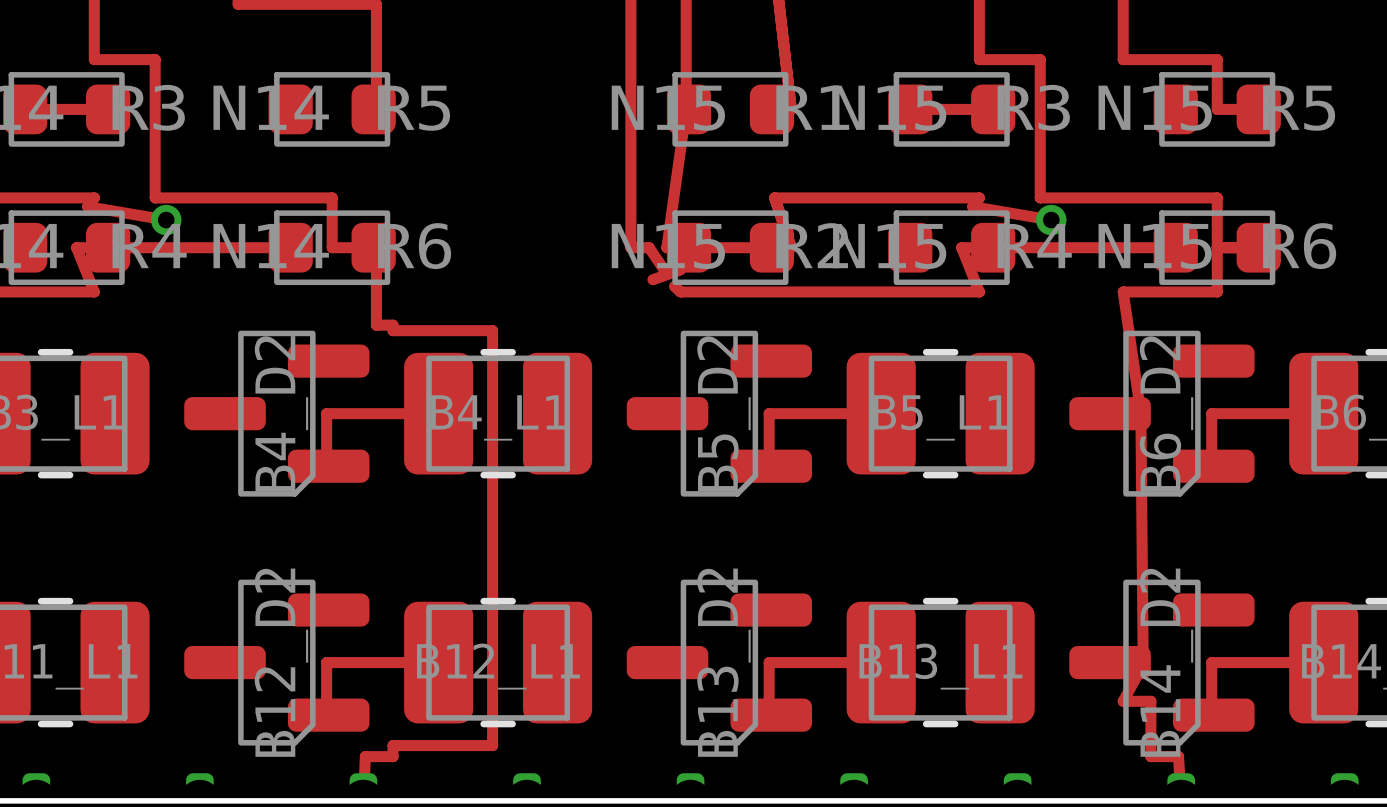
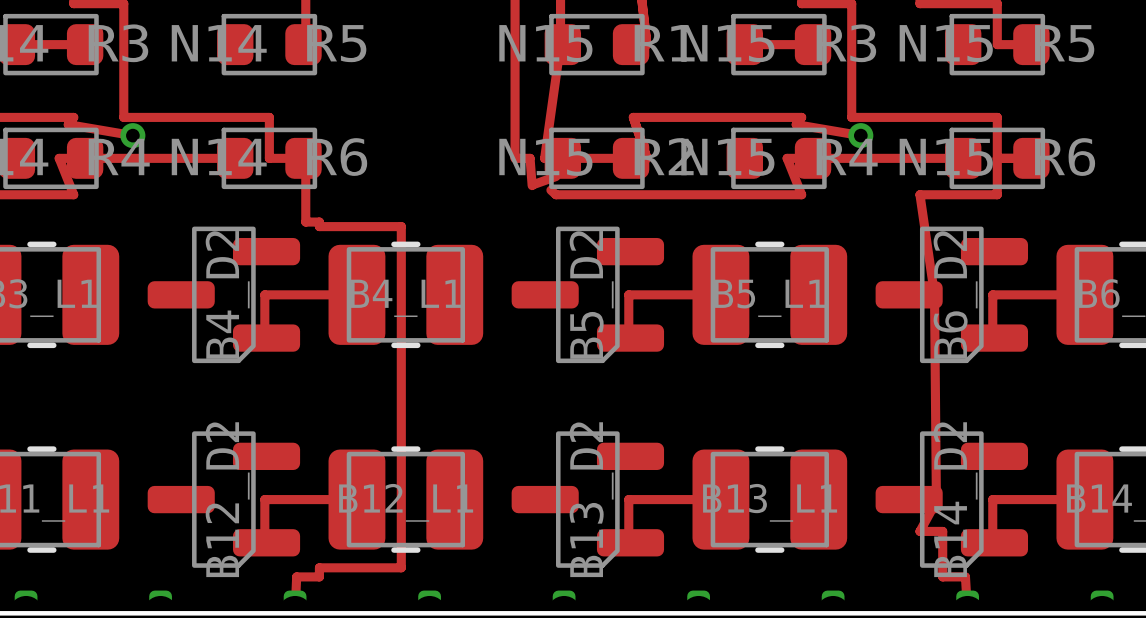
track: (649, 247) (664, 269) -> (530, 158) (532, 185)

